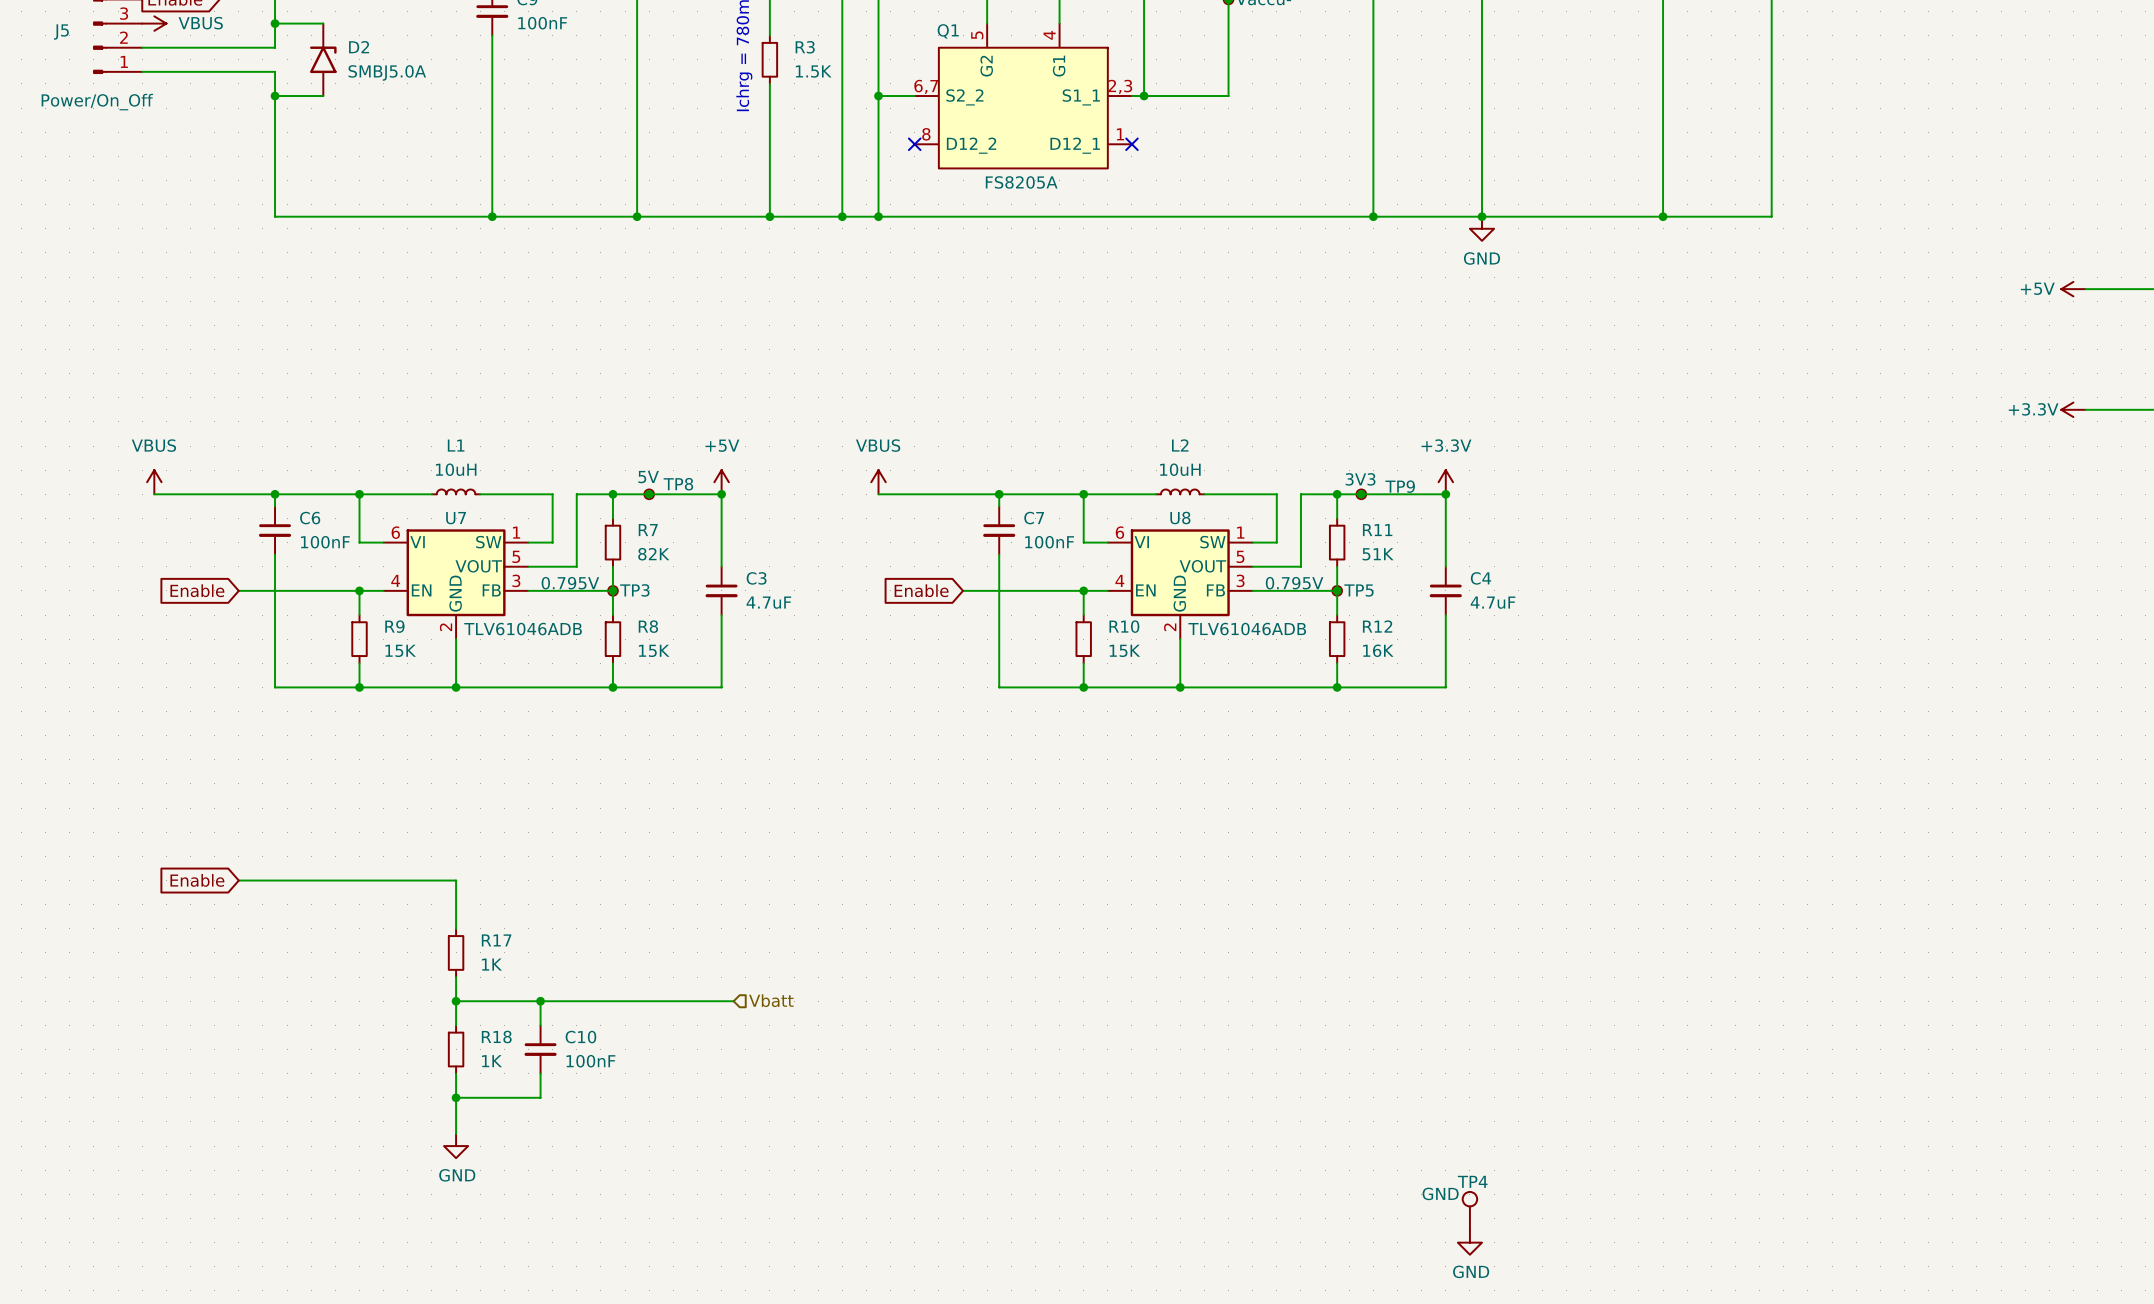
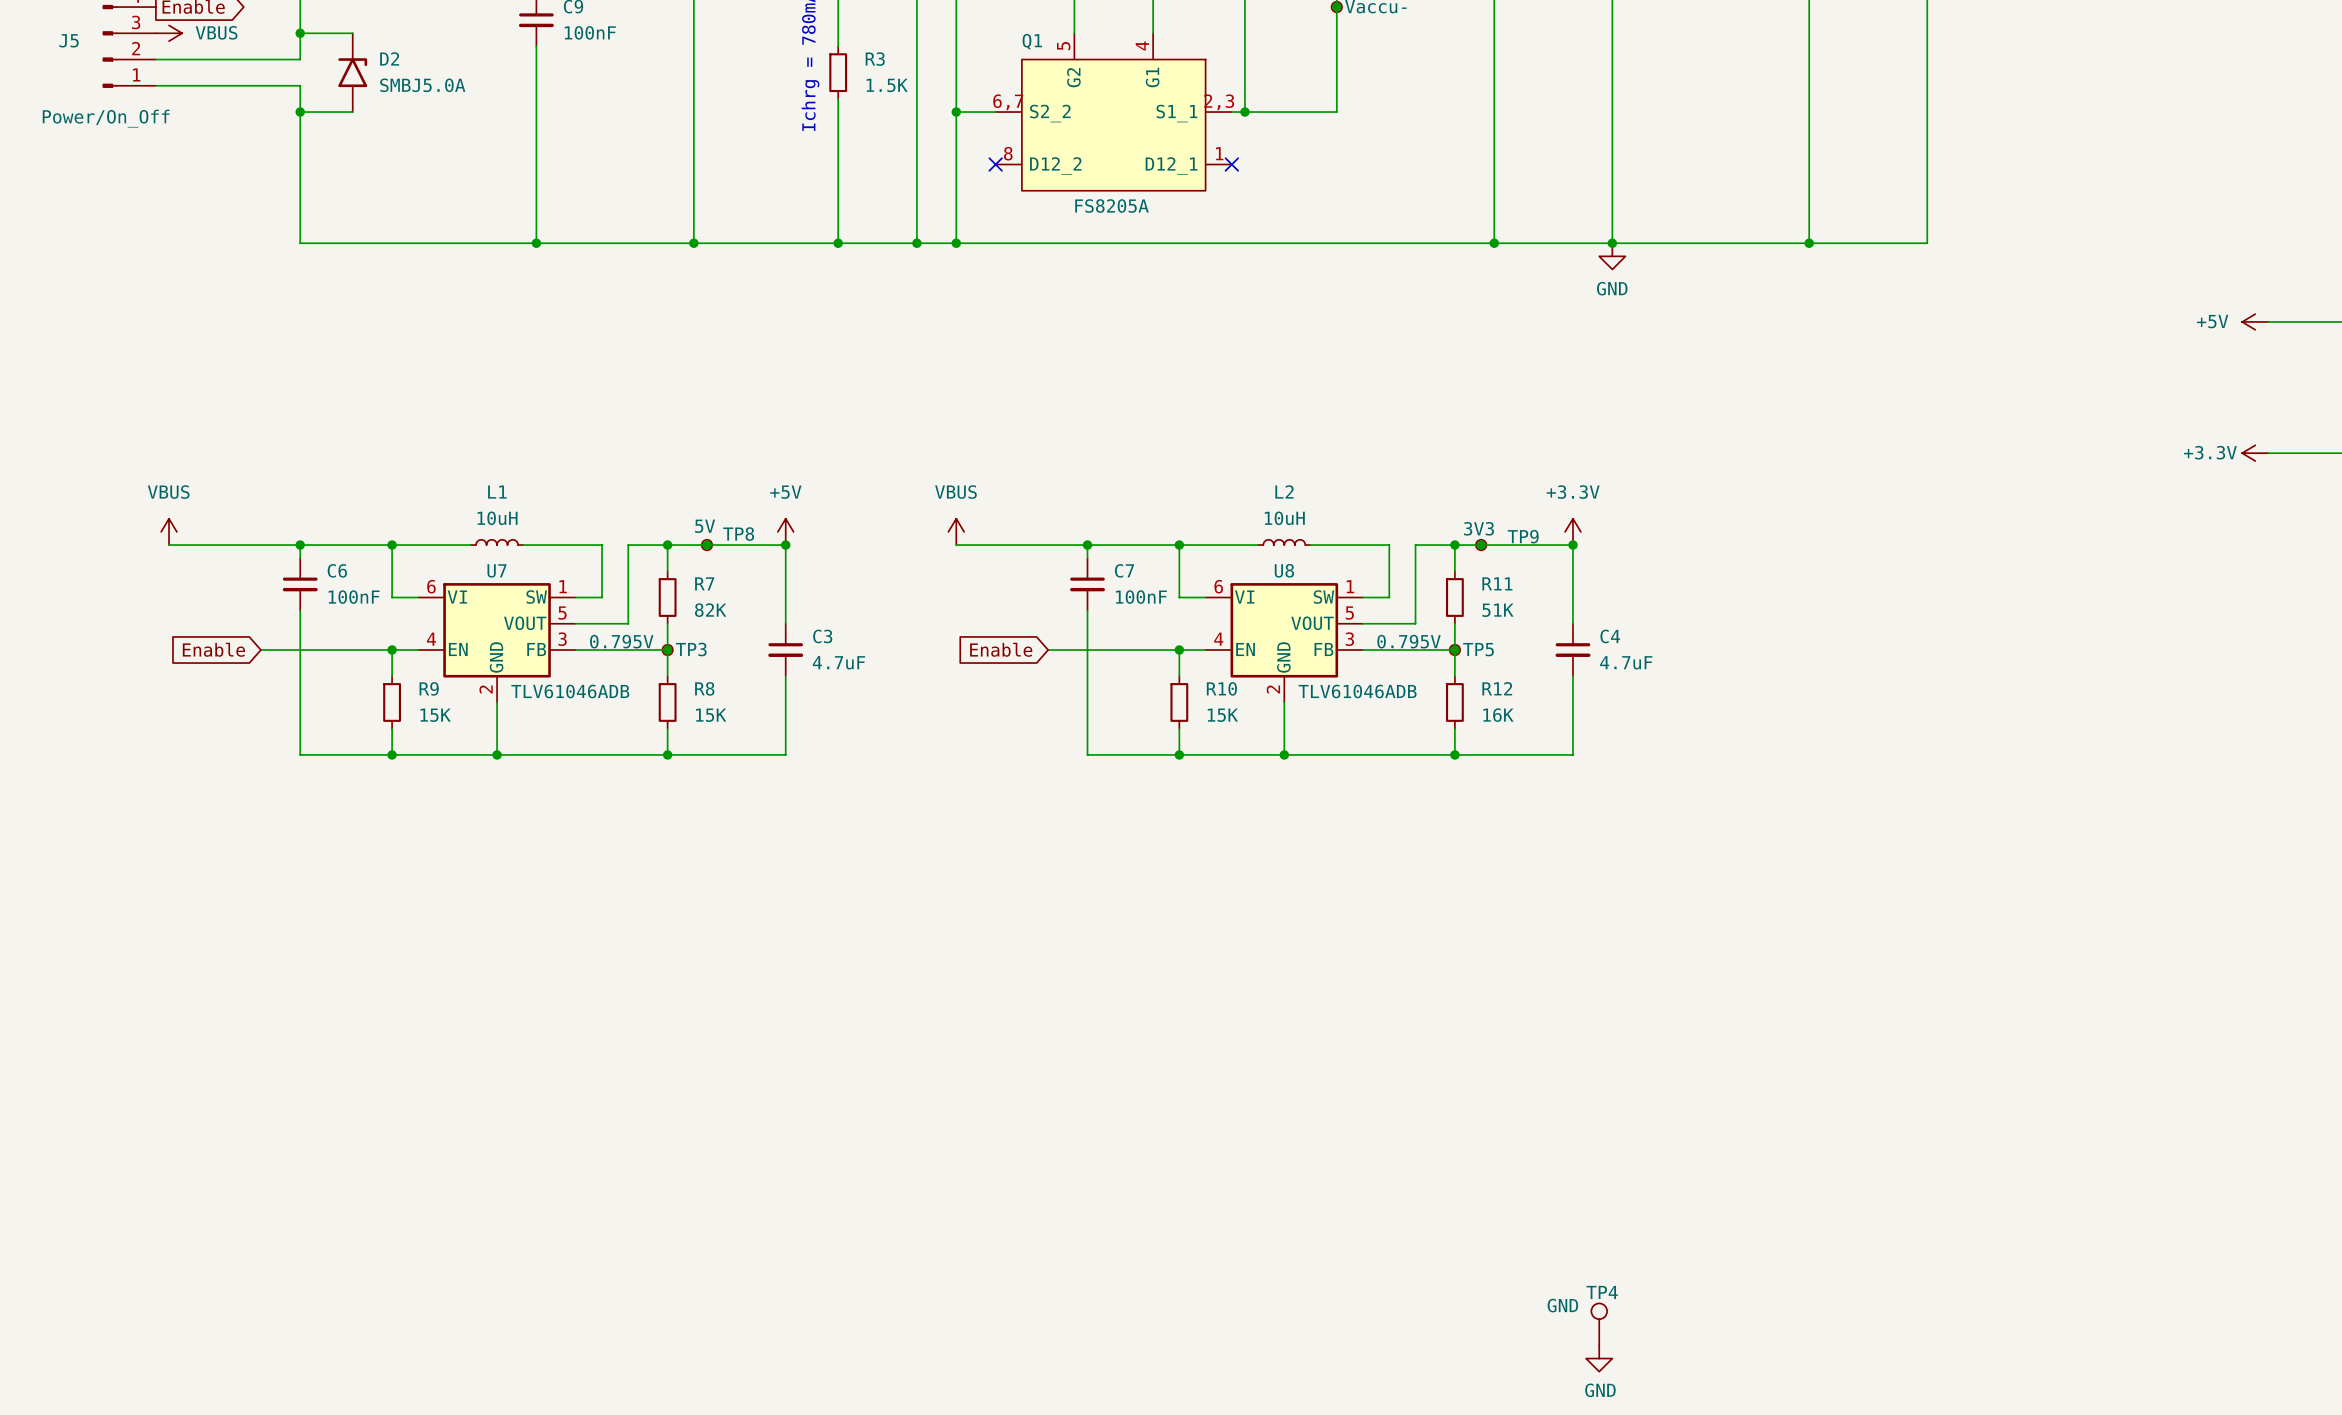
global label: Enable (197, 880) -> none
wire: (238, 880) (456, 880) (456, 928) -> none
R17: 1K (456, 952) -> none
wire: (456, 977) (456, 1025) -> none
hierarchical label: Vbatt (771, 1000) -> none
wire: (456, 1001) (733, 1001) -> none
junction: (456, 1001) -> none
wire: (540, 1001) (540, 1025) -> none
junction: (540, 1001) -> none
R18: 1K (456, 1049) -> none
C10: 100nF (540, 1049) -> none
wire: (456, 1073) (456, 1134) -> none
wire: (540, 1073) (540, 1097) (456, 1097) -> none
junction: (456, 1097) -> none
power symbol: GND (456, 1146) -> none

